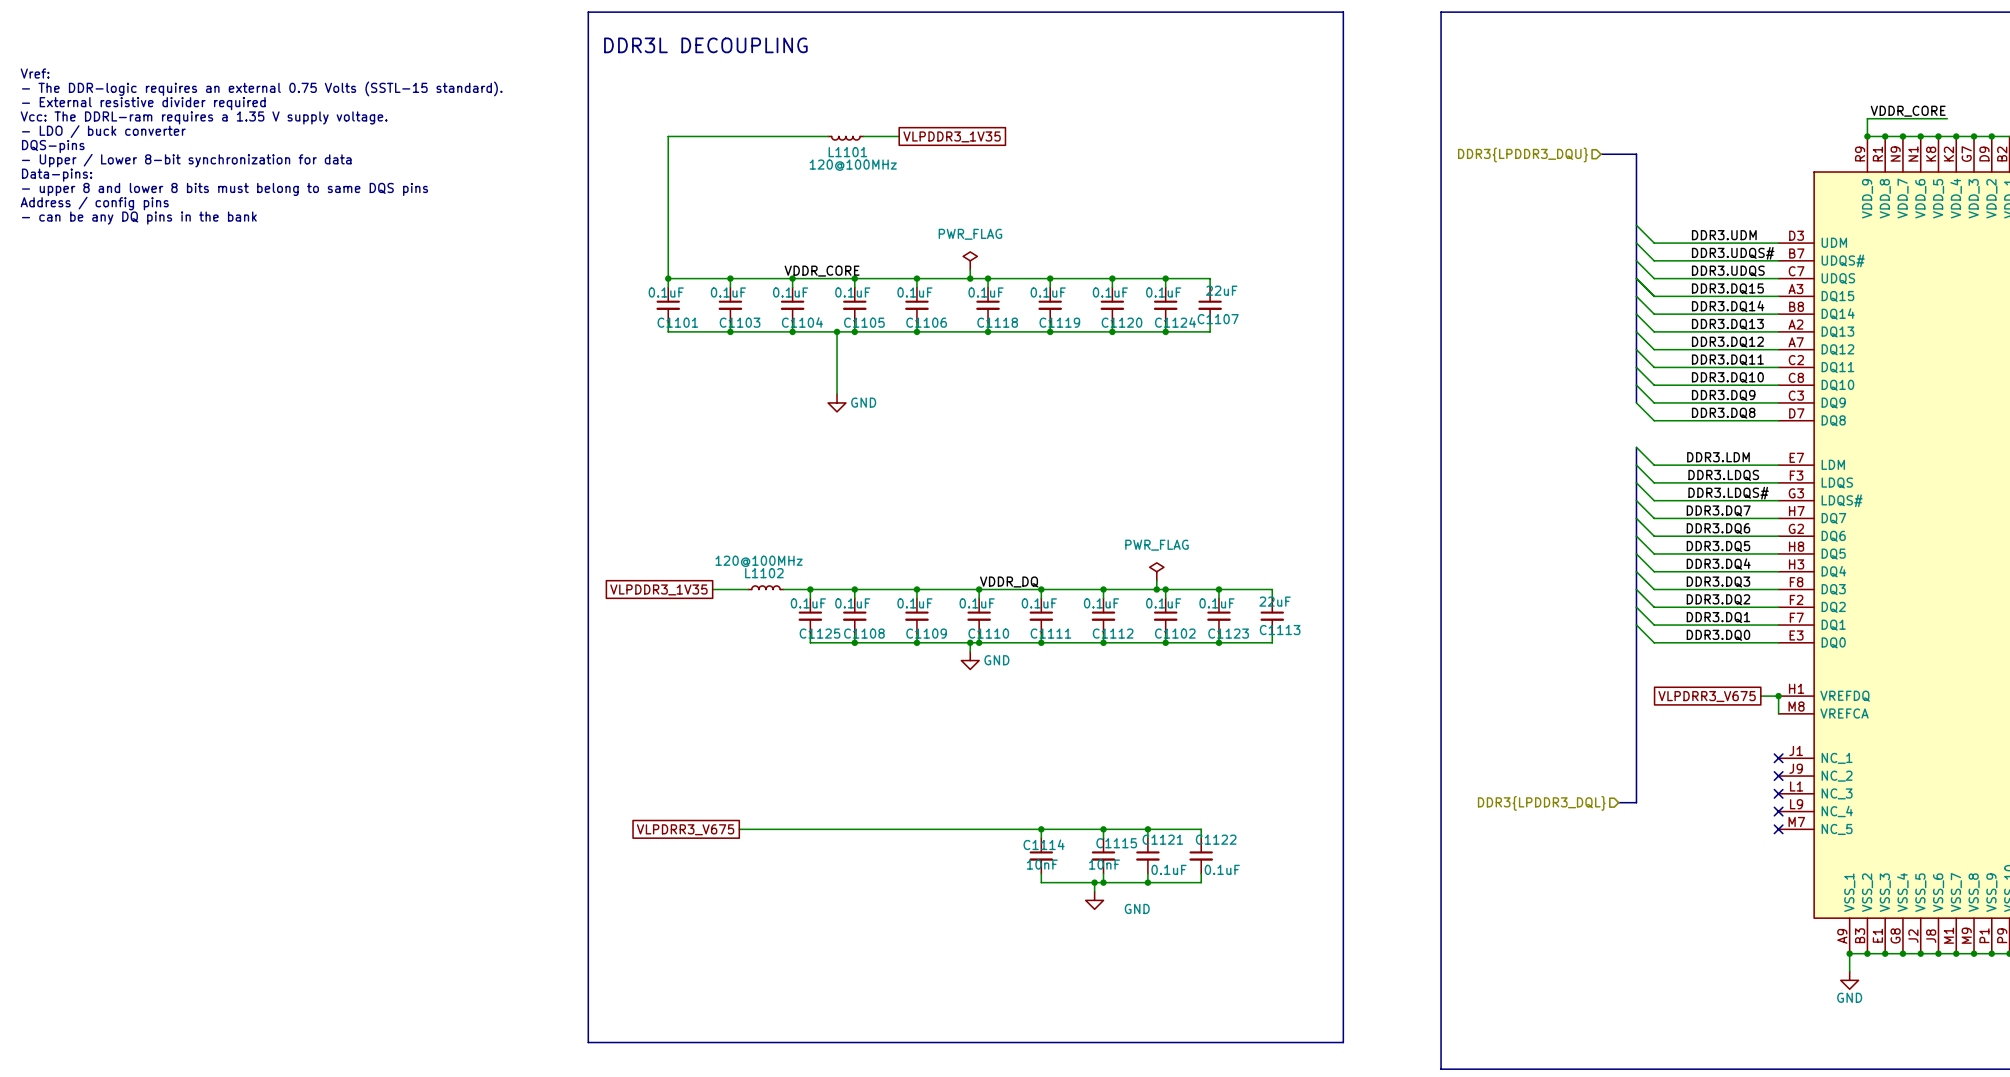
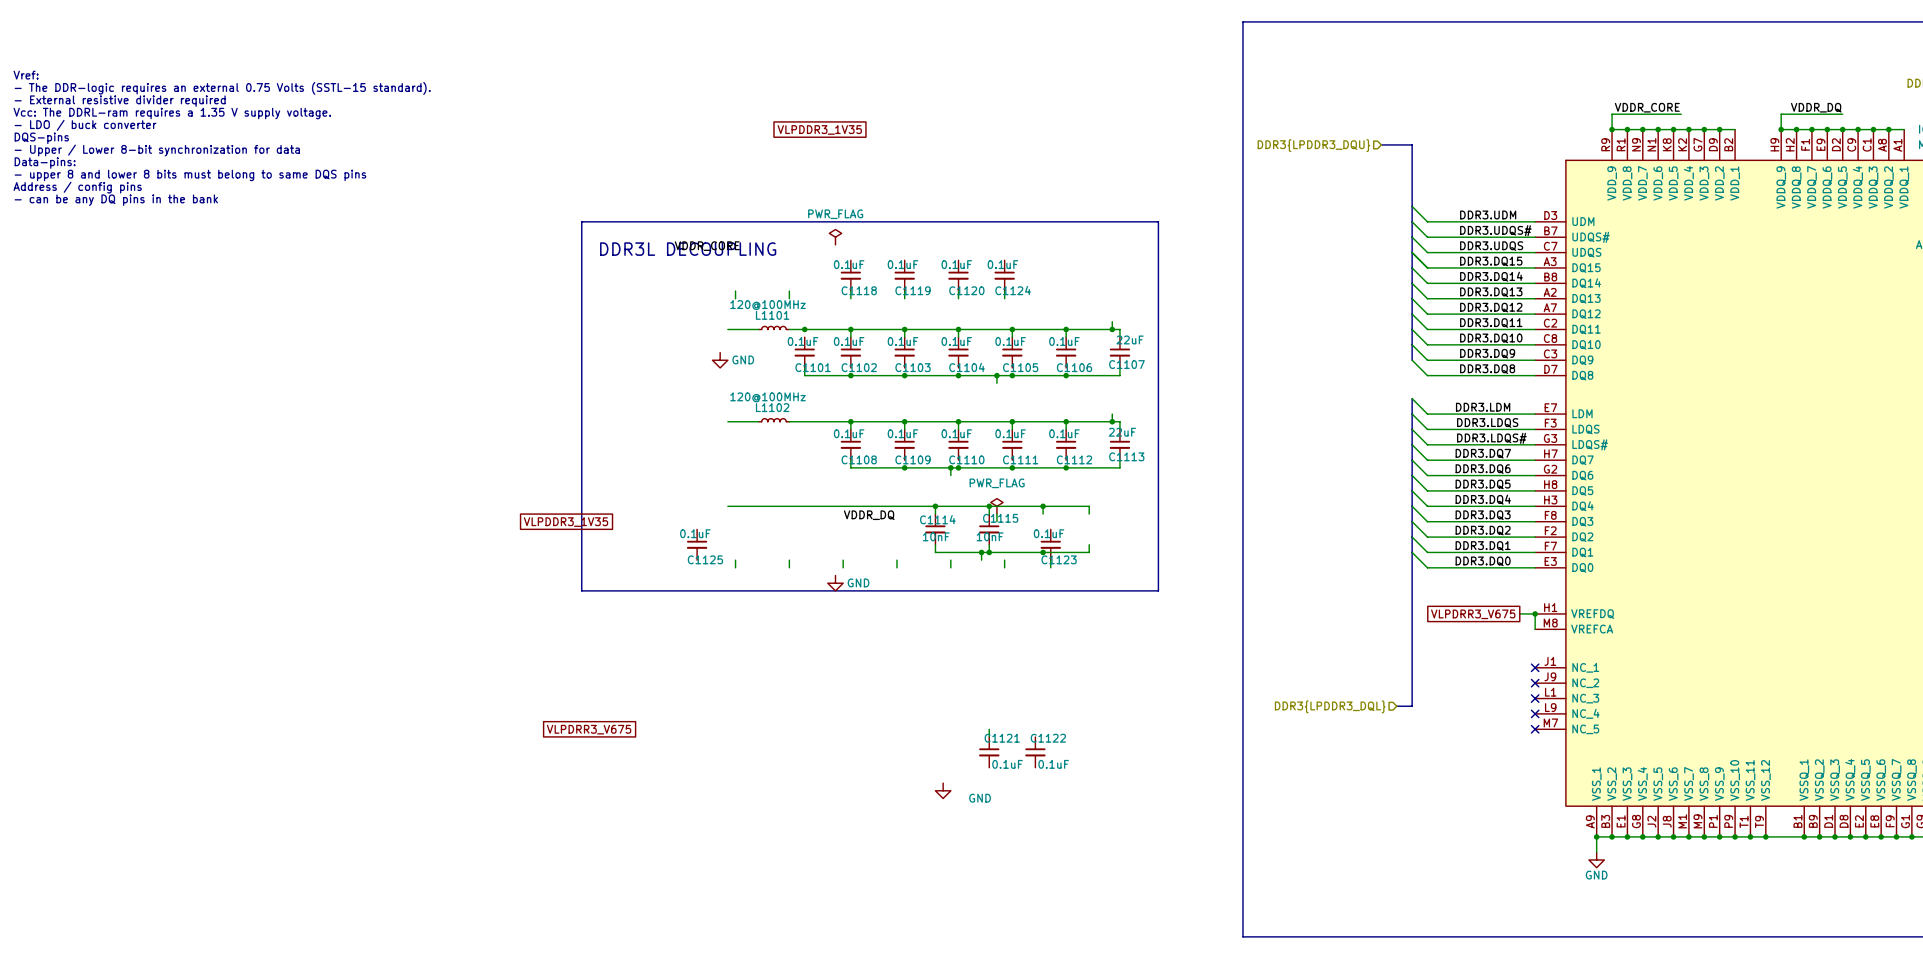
text: DDR3L DECOUPLING (705, 45) -> none
wire: (828, 136) (668, 136) (668, 287) -> none
wire: (863, 136) (899, 136) -> none
L1101 rotation: 0° (845, 138) -> 180° (773, 327)
L1101 position: (845, 138) -> (773, 327)
line: (1343, 243) (1343, 12) (588, 12) (588, 1042) (1343, 1042) (1343, 669) -> (1158, 221) (581, 221) (581, 590) (1158, 590)
wire: (970, 269) (970, 278) -> none
text: none -> DDR3L DECOUPLING (688, 249)
wire: (668, 278) (1210, 278) (1210, 287) -> none
junction: (668, 278) -> none
wire: (730, 278) (730, 287) -> none
junction: (730, 278) -> none
wire: (792, 278) (792, 287) -> none
junction: (792, 278) -> none
wire: (854, 278) (854, 287) -> none
junction: (854, 278) -> none
wire: (916, 278) (916, 287) -> none
junction: (916, 278) -> none
junction: (970, 278) -> none
wire: (988, 278) (988, 287) -> (850, 329) (850, 337)
junction: (988, 278) -> none
wire: (1050, 278) (1050, 287) -> (904, 329) (904, 337)
junction: (1050, 278) -> none
wire: (1112, 278) (1112, 287) -> (958, 329) (958, 337)
junction: (1112, 278) -> none
wire: (1165, 278) (1165, 287) -> (1066, 329) (1066, 337)
junction: (1165, 278) -> none
C1101 position: (668, 305) -> (804, 352)
C1103 position: (730, 305) -> (904, 352)
C1104 position: (792, 305) -> (958, 352)
C1105 position: (854, 305) -> (1012, 352)
C1106 position: (916, 305) -> (1066, 352)
C1107 position: (1210, 305) -> (1119, 352)
wire: (668, 323) (668, 331) (1210, 331) (1210, 323) -> none
wire: (730, 323) (730, 331) -> none
wire: (792, 323) (792, 331) -> none
junction: (730, 331) -> none
junction: (792, 331) -> none
wire: (837, 331) (837, 394) -> none
junction: (837, 331) -> none
junction: (854, 331) -> none
junction: (916, 331) -> none
junction: (988, 331) -> none
junction position: (1050, 331) -> (904, 329)
junction: (1112, 331) -> none
junction: (1165, 331) -> none
wire: none -> (1112, 321) (1112, 329)
wire: none -> (727, 329) (758, 329)
wire: none -> (789, 329) (1119, 329) (1119, 337)
junction: none -> (804, 329)
junction: none -> (850, 329)
junction: none -> (958, 329)
wire: none -> (1012, 329) (1012, 337)
junction: none -> (1012, 329)
junction: none -> (1066, 329)
junction: none -> (1112, 329)
wire: none -> (804, 367) (804, 375) (1119, 375) (1119, 367)
junction: none -> (850, 375)
junction: none -> (904, 375)
junction: none -> (958, 375)
wire: none -> (996, 375) (996, 383)
junction: none -> (996, 375)
junction: none -> (1012, 375)
junction: none -> (1066, 375)
wire: none -> (1112, 414) (1112, 421)
wire: none -> (727, 421) (758, 421)
wire: none -> (789, 421) (1119, 421) (1119, 429)
junction: none -> (850, 421)
junction: none -> (904, 421)
junction: none -> (958, 421)
junction: none -> (1012, 421)
junction: none -> (1066, 421)
junction: none -> (1112, 421)
wire: none -> (850, 460) (850, 467) (1119, 467) (1119, 460)
junction: none -> (904, 467)
wire: none -> (950, 467) (950, 475)
junction: none -> (950, 467)
junction: none -> (958, 467)
junction: none -> (1012, 467)
junction: none -> (1066, 467)
wire: none -> (727, 506) (1089, 506) (1089, 514)
wire: none -> (935, 506) (935, 514)
junction: none -> (935, 506)
wire: none -> (989, 506) (989, 514)
junction: none -> (989, 506)
junction: none -> (1043, 506)
L1102 position: (765, 587) -> (773, 420)
wire: (712, 589) (748, 589) -> none
wire: (783, 589) (1272, 589) (1272, 598) -> none
wire: (810, 589) (810, 598) -> none
junction: (810, 589) -> none
wire: (854, 589) (854, 598) -> none
junction: (854, 589) -> none
wire: (916, 589) (916, 598) -> (850, 421) (850, 429)
junction: (916, 589) -> none
wire: (979, 589) (979, 598) -> (904, 421) (904, 429)
junction: (979, 589) -> none
wire: (1041, 589) (1041, 598) -> (958, 421) (958, 429)
junction: (1041, 589) -> none
wire: (1103, 589) (1103, 598) -> (1012, 421) (1012, 429)
junction: (1103, 589) -> none
junction: (1156, 589) -> none
wire: (1165, 589) (1165, 598) -> (1066, 421) (1066, 429)
junction: (1165, 589) -> none
wire: (1218, 589) (1218, 598) -> (1043, 506) (1043, 514)
junction: (1218, 589) -> none
C1108 position: (854, 616) -> (850, 444)
C1109 position: (916, 616) -> (904, 444)
C1110 position: (979, 616) -> (958, 444)
C1111 position: (1041, 616) -> (1012, 444)
wire: none -> (935, 544) (935, 552) (1089, 552) (1089, 544)
C1112 position: (1103, 616) -> (1066, 444)
wire: none -> (989, 544) (989, 552)
C1102 position: (1165, 616) -> (850, 352)
C1113 position: (1272, 616) -> (1119, 444)
junction: none -> (981, 552)
junction: none -> (989, 552)
junction: none -> (1043, 552)
wire: (810, 633) (810, 642) (1272, 642) (1272, 633) -> none
junction: (854, 642) -> none
junction: (916, 642) -> none
wire: (970, 642) (970, 651) -> (981, 552) (981, 560)
junction: (970, 642) -> none
junction: (979, 642) -> none
junction: (1041, 642) -> none
junction: (1103, 642) -> none
junction: (1165, 642) -> none
junction: (1218, 642) -> none
wire: (739, 829) (1201, 829) (1201, 838) -> none
wire: (1041, 829) (1041, 838) -> none
junction: (1041, 829) -> none
wire: (1103, 829) (1103, 838) -> none
junction: (1103, 829) -> none
junction: (1147, 829) -> none
C1114 position: (1041, 855) -> (935, 529)
C1115 position: (1103, 855) -> (989, 529)
wire: (1041, 873) (1041, 882) (1201, 882) (1201, 873) -> none
wire: (1103, 873) (1103, 882) -> none
wire: (1147, 873) (1147, 882) -> none
wire: (1094, 882) (1094, 891) -> none
junction: (1094, 882) -> none
junction: (1103, 882) -> none
junction: (1147, 882) -> none

